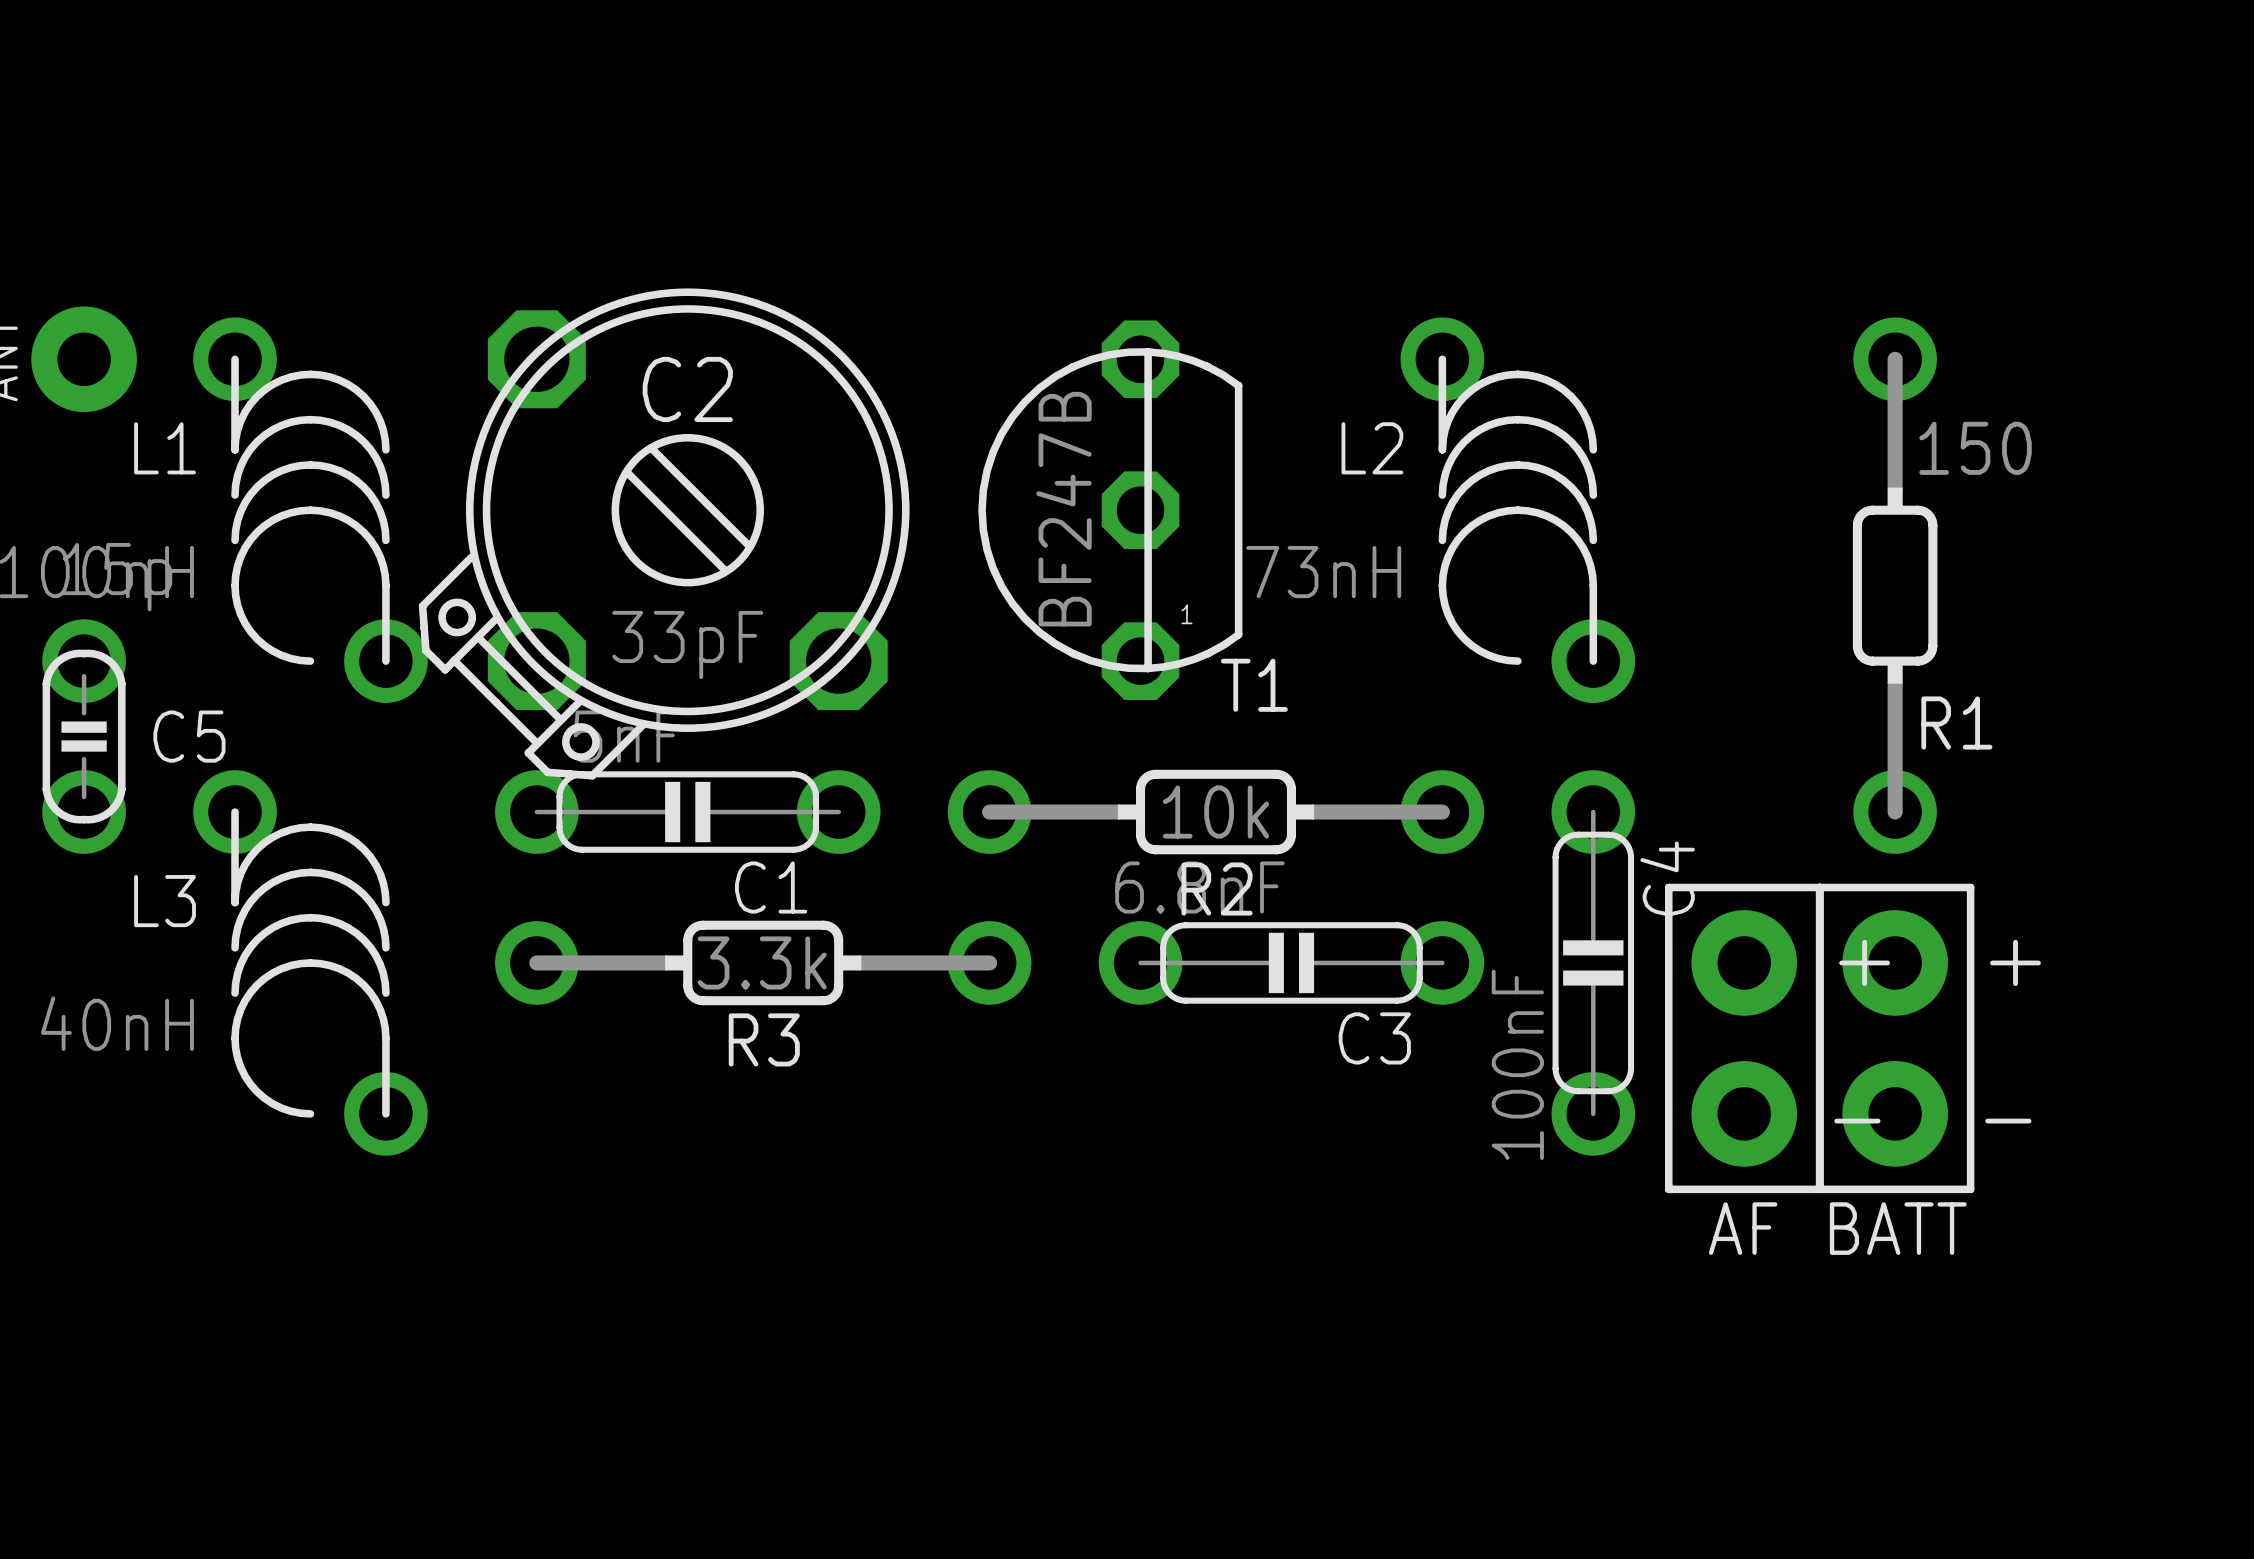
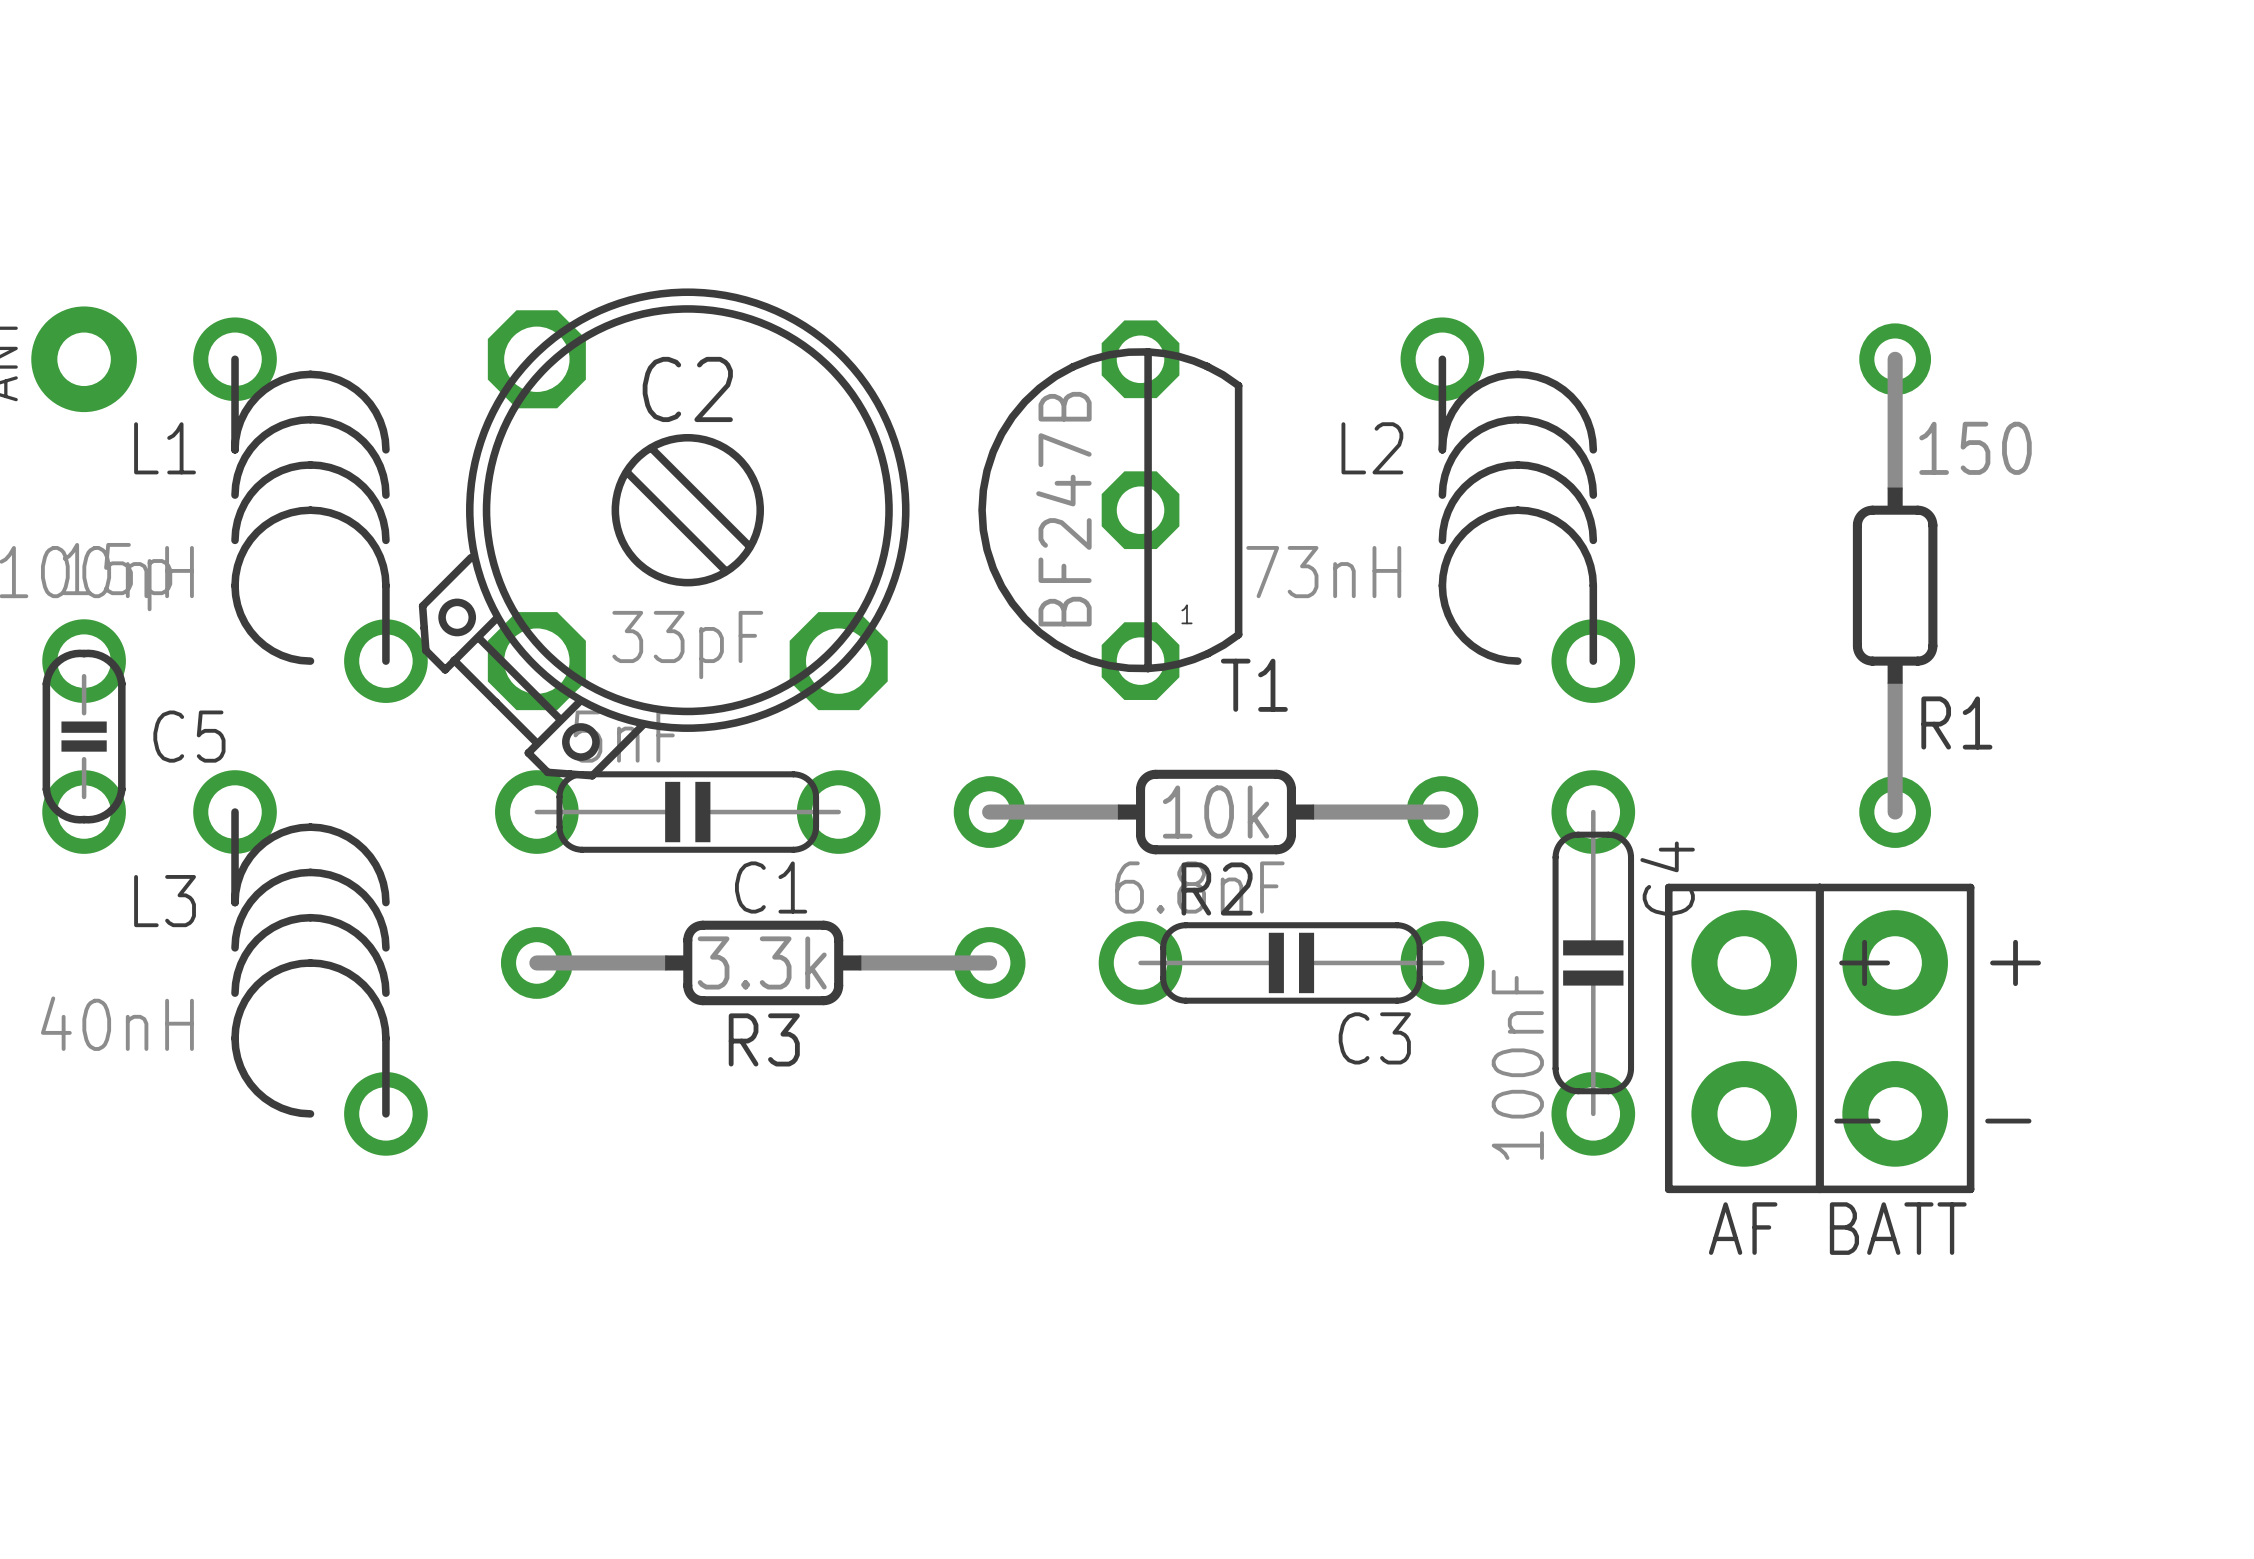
R1 footprint: [1852, 317, 1938, 854] -> [1852, 323, 1938, 848]
R2 footprint: [947, 769, 1485, 855] -> [953, 769, 1479, 855]
R3 footprint: [495, 920, 1032, 1006] -> [500, 920, 1026, 1006]

